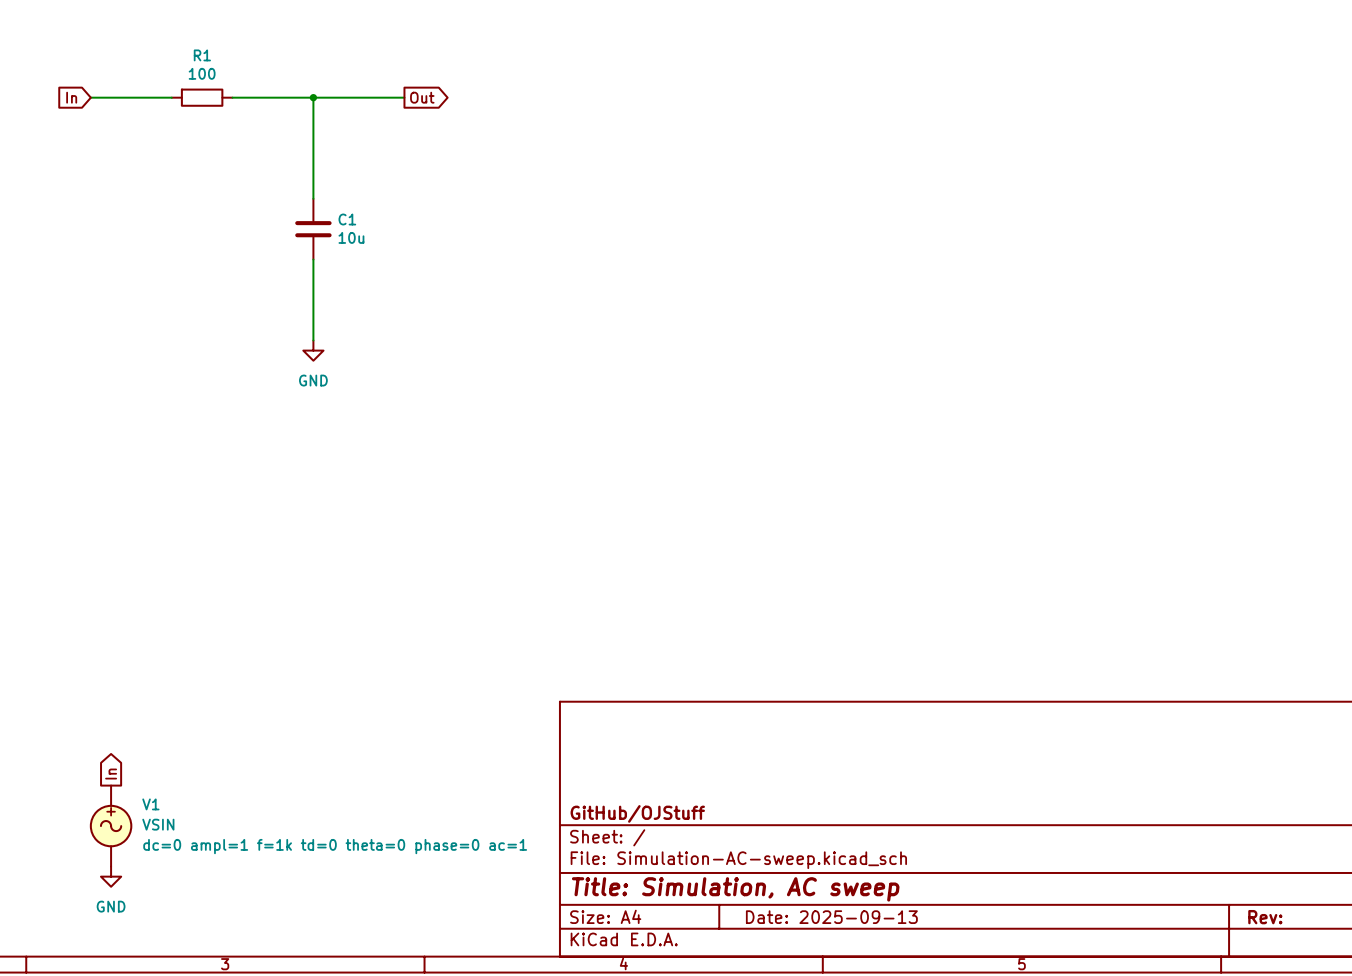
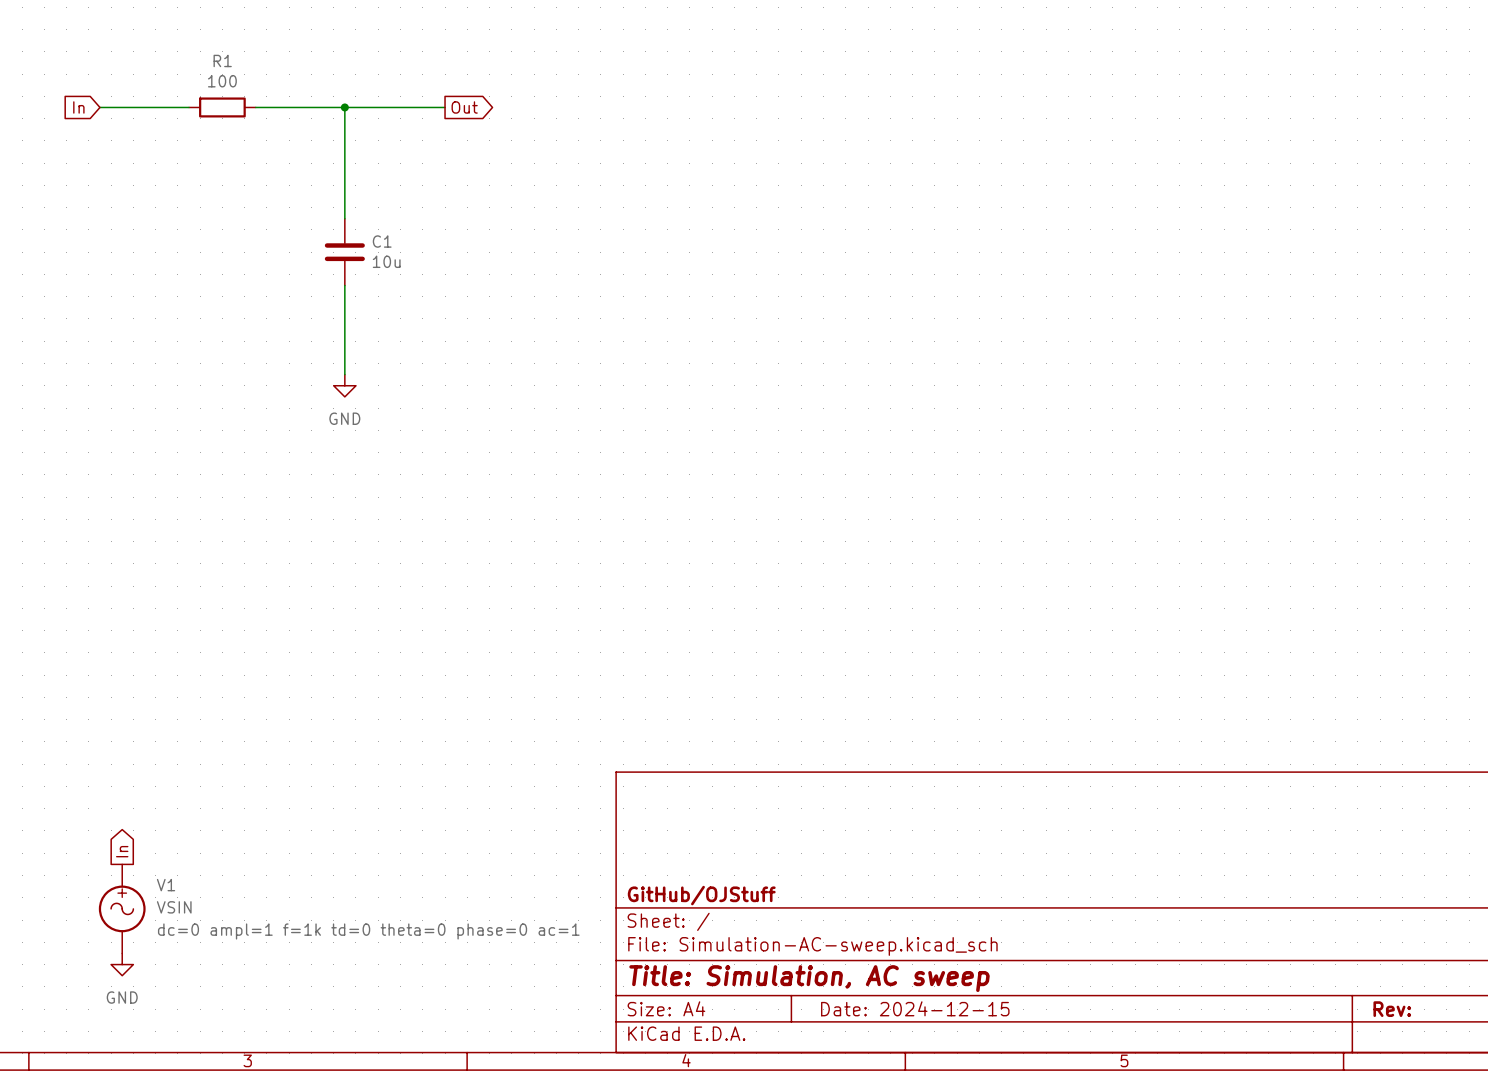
title block: Date: 2025-09-13 (831, 917) -> Date: 2024-12-15 (915, 1008)

